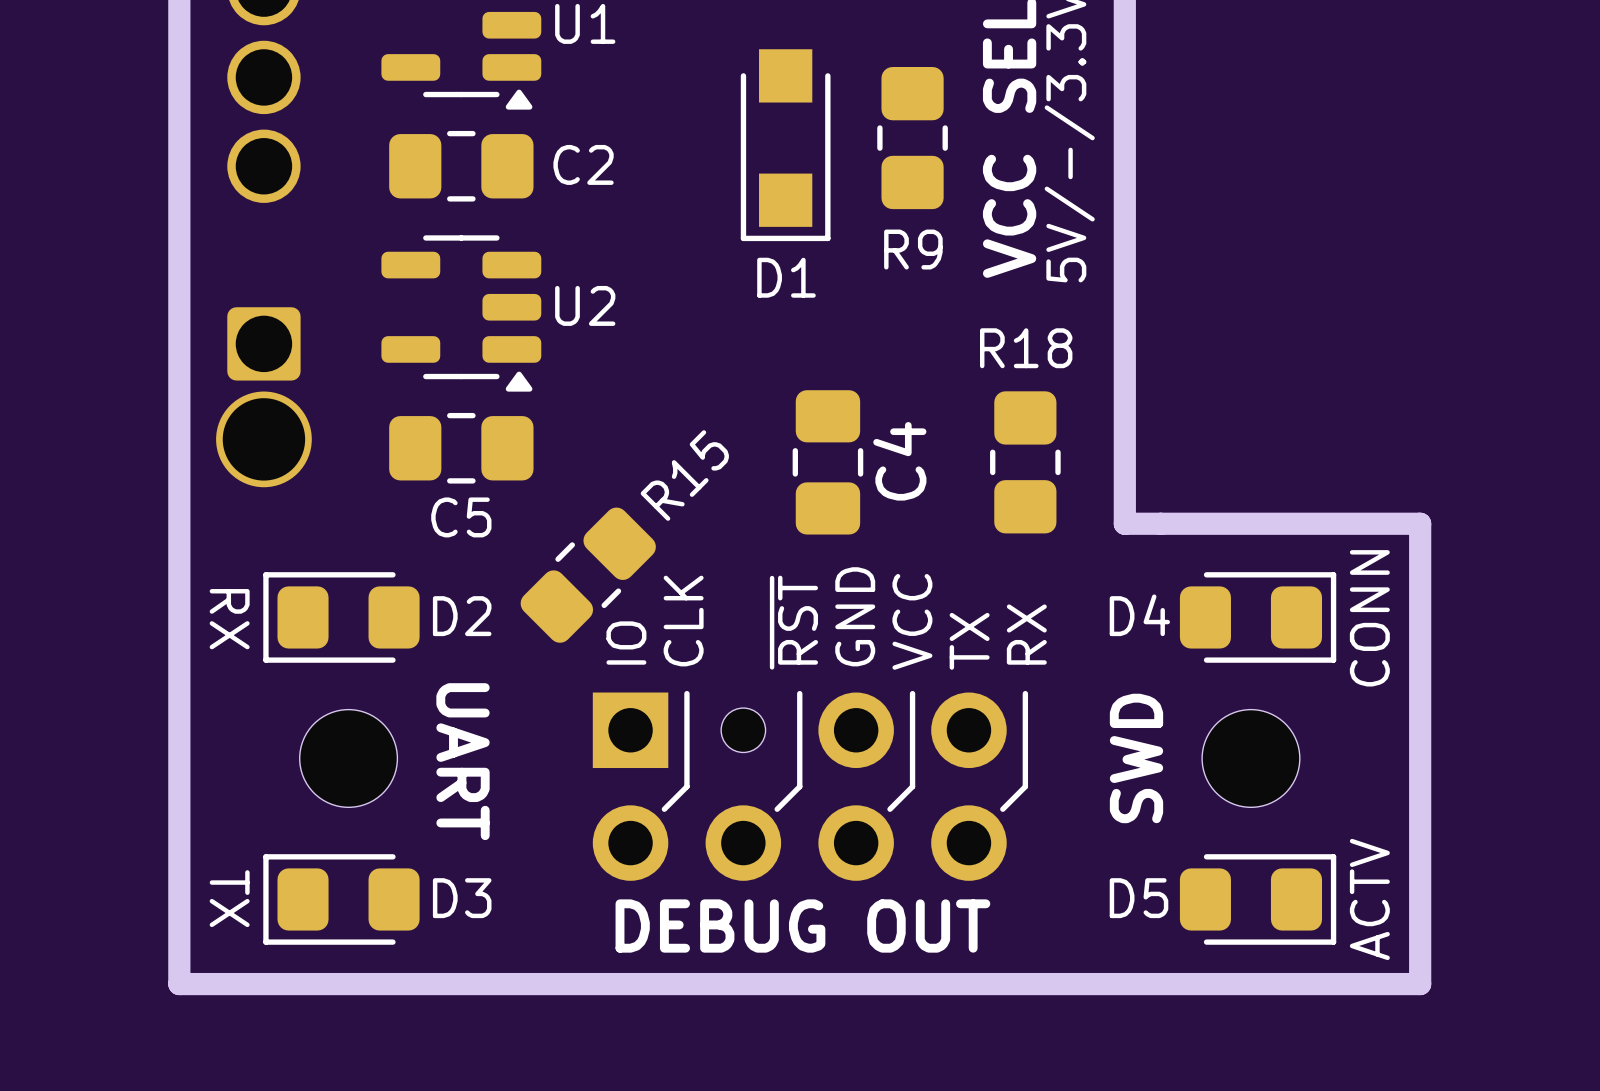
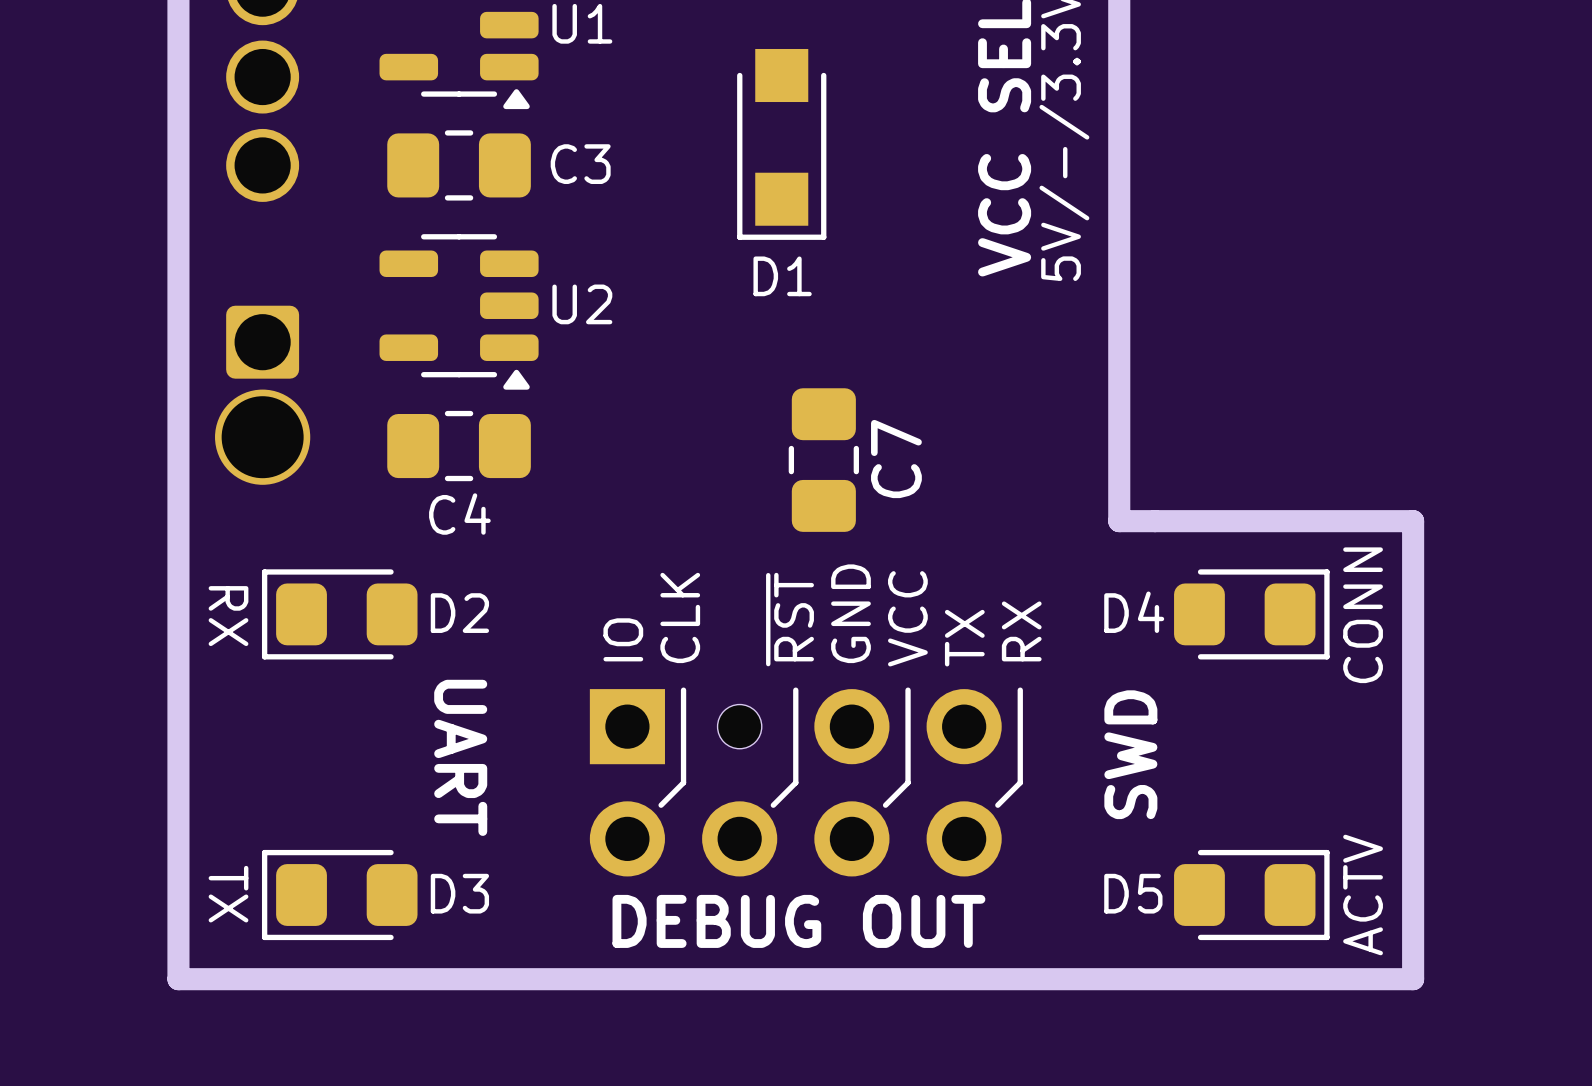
R9: (912, 138) -> none
C2 name: C2 (583, 164) -> C3 (580, 164)
C4 name: C4 (899, 461) -> C7 (896, 459)
R18: (1025, 462) -> none
C5 name: C5 (461, 517) -> C4 (459, 514)
R15: (588, 575) -> none
part: (348, 758) -> none
part: (1250, 758) -> none

